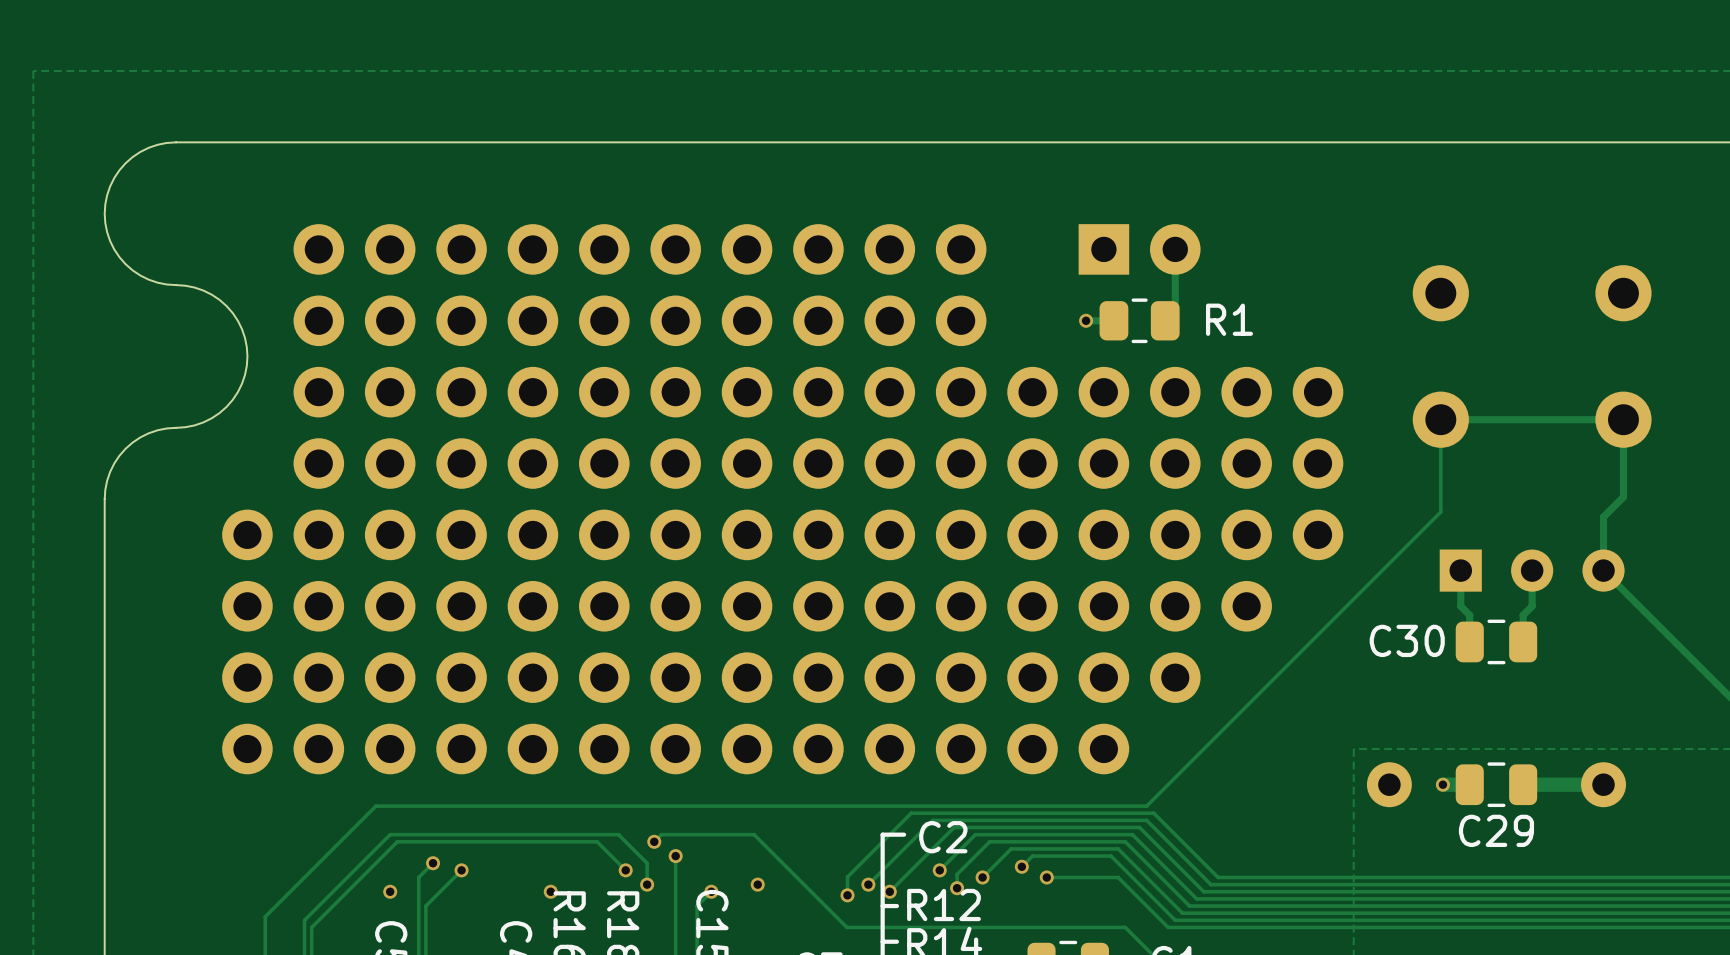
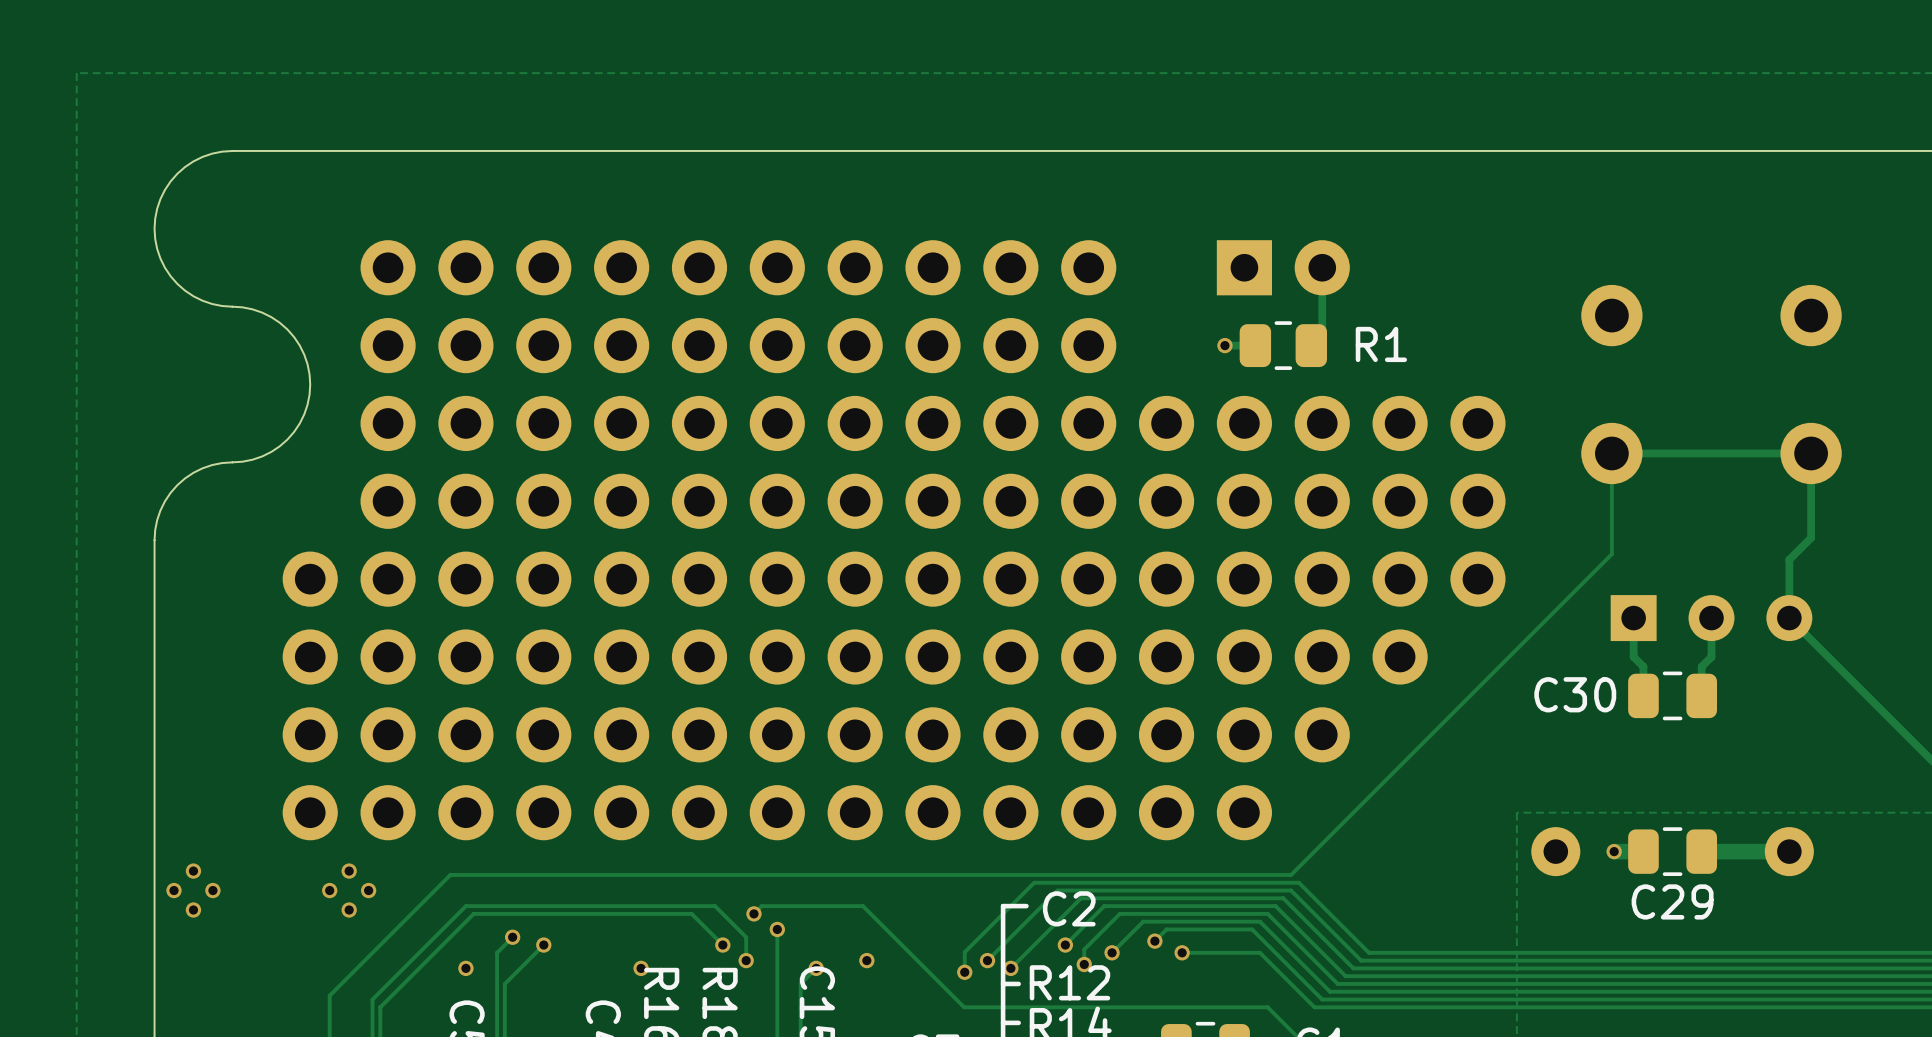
via: none -> (193, 871)
via: none -> (349, 871)
via: none -> (174, 890)
via: none -> (212, 890)
via: none -> (329, 890)
via: none -> (368, 890)
via: none -> (193, 910)
via: none -> (349, 910)

